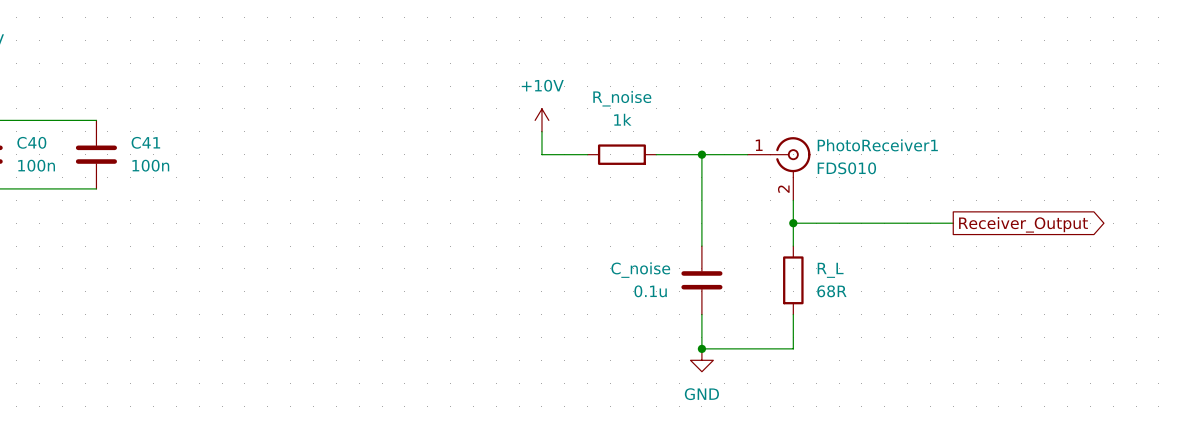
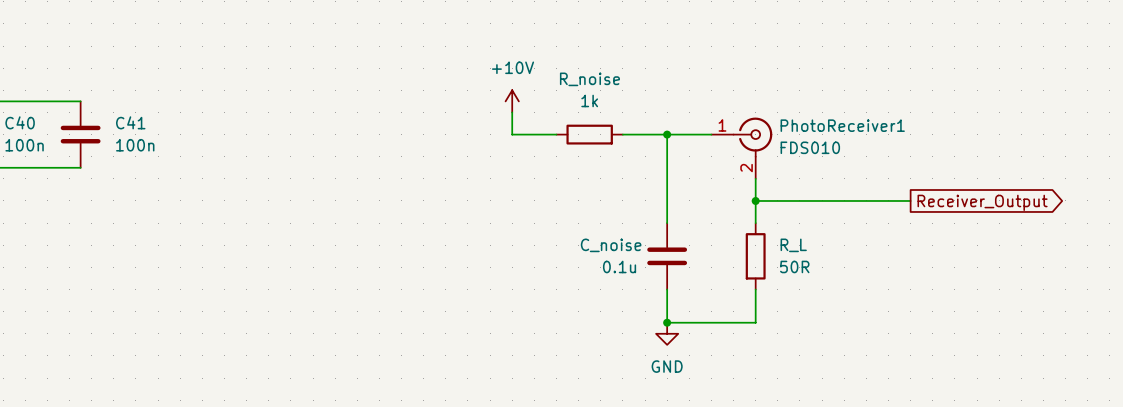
R_L value: 68R (831, 291) -> 50R (794, 266)

